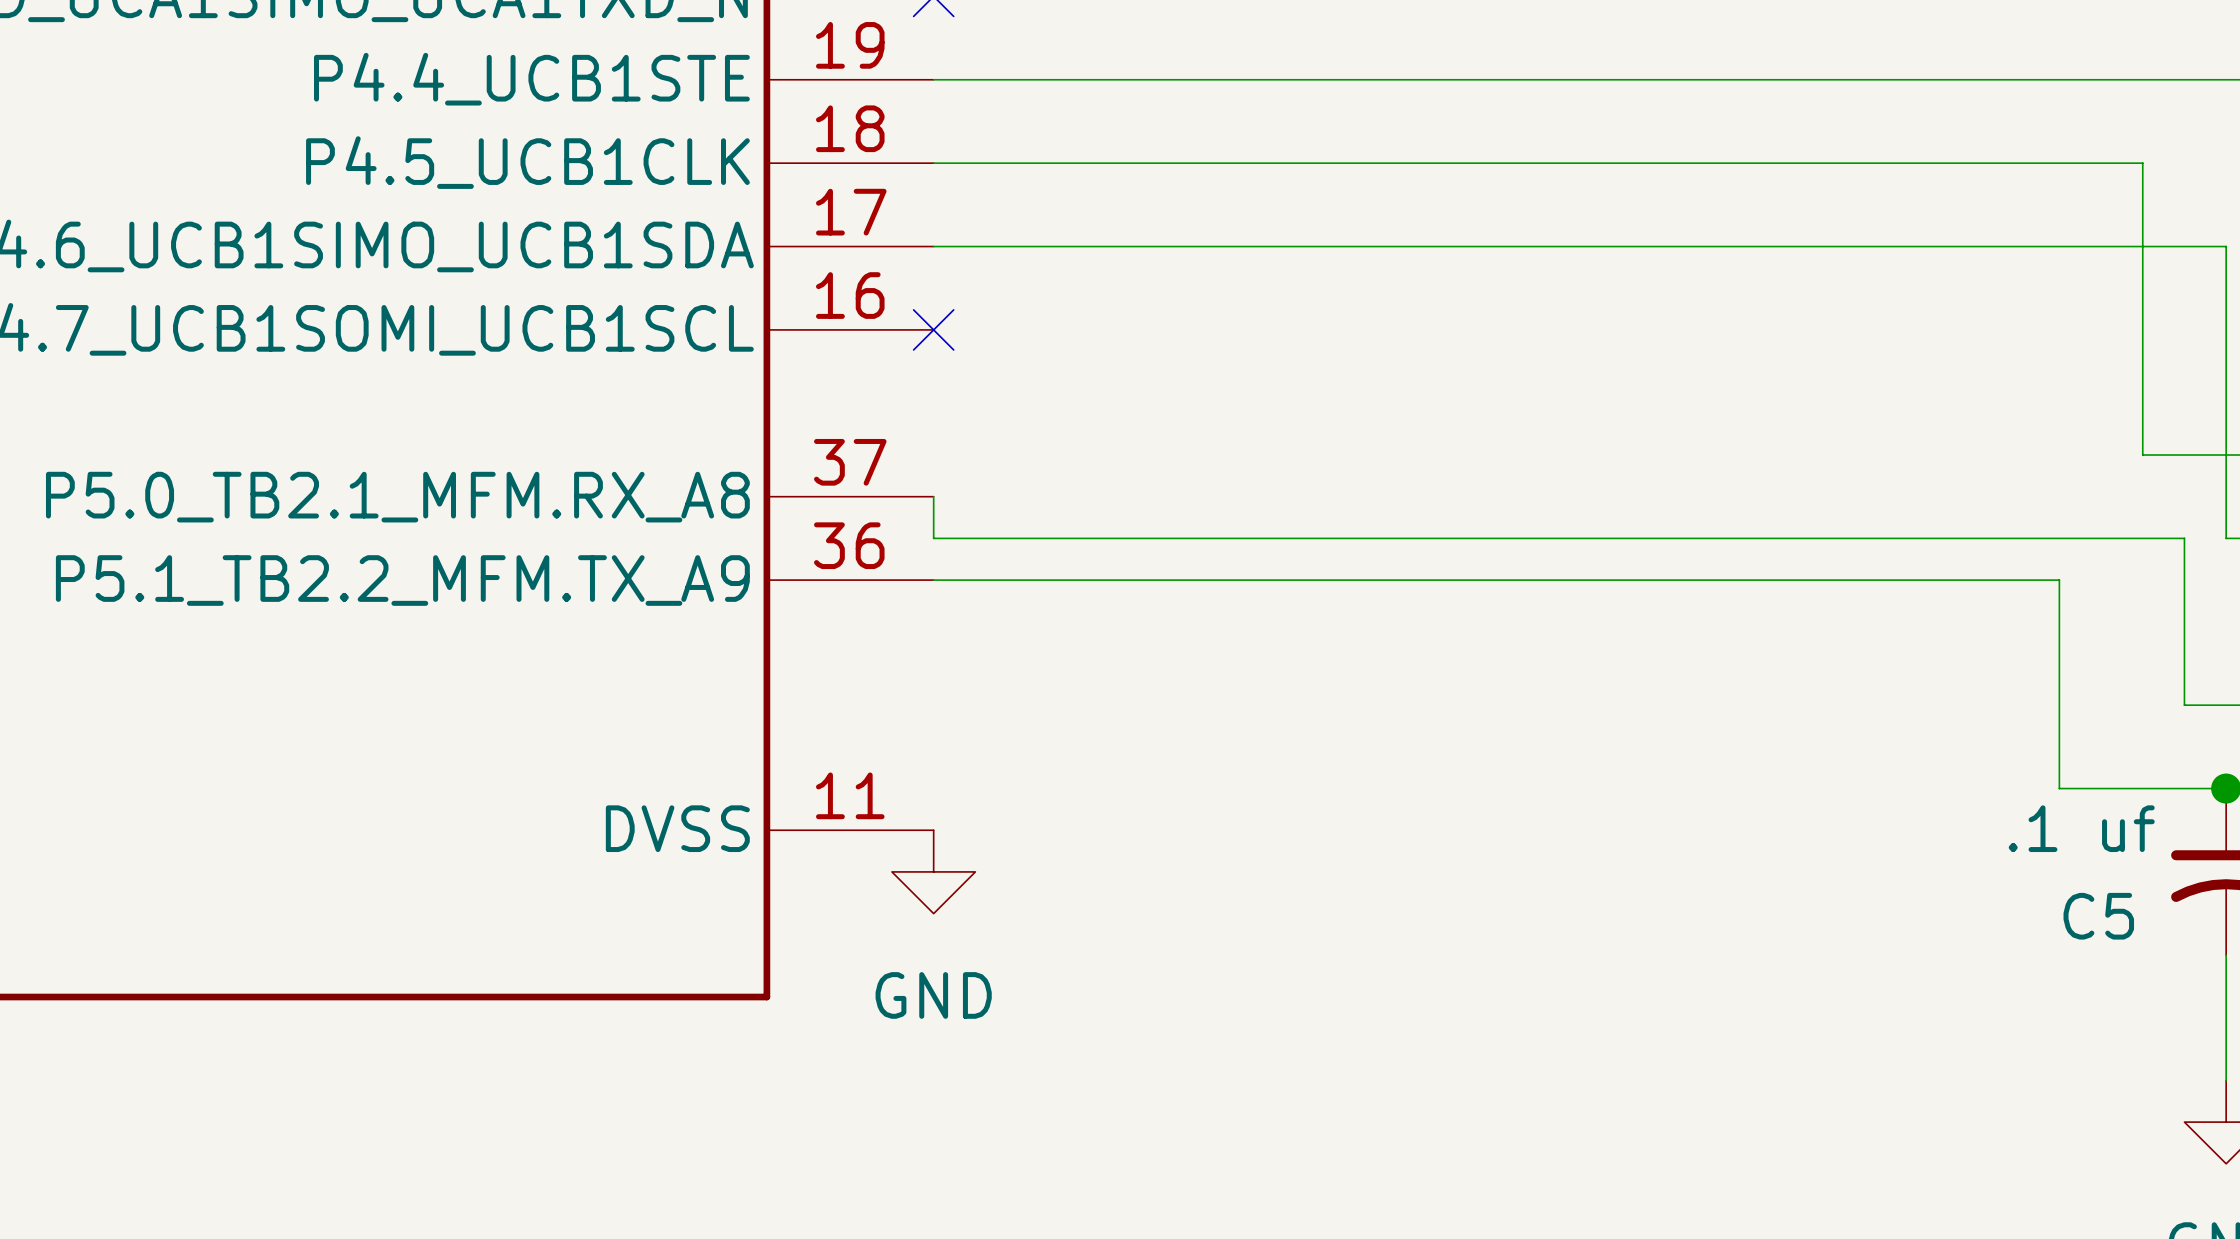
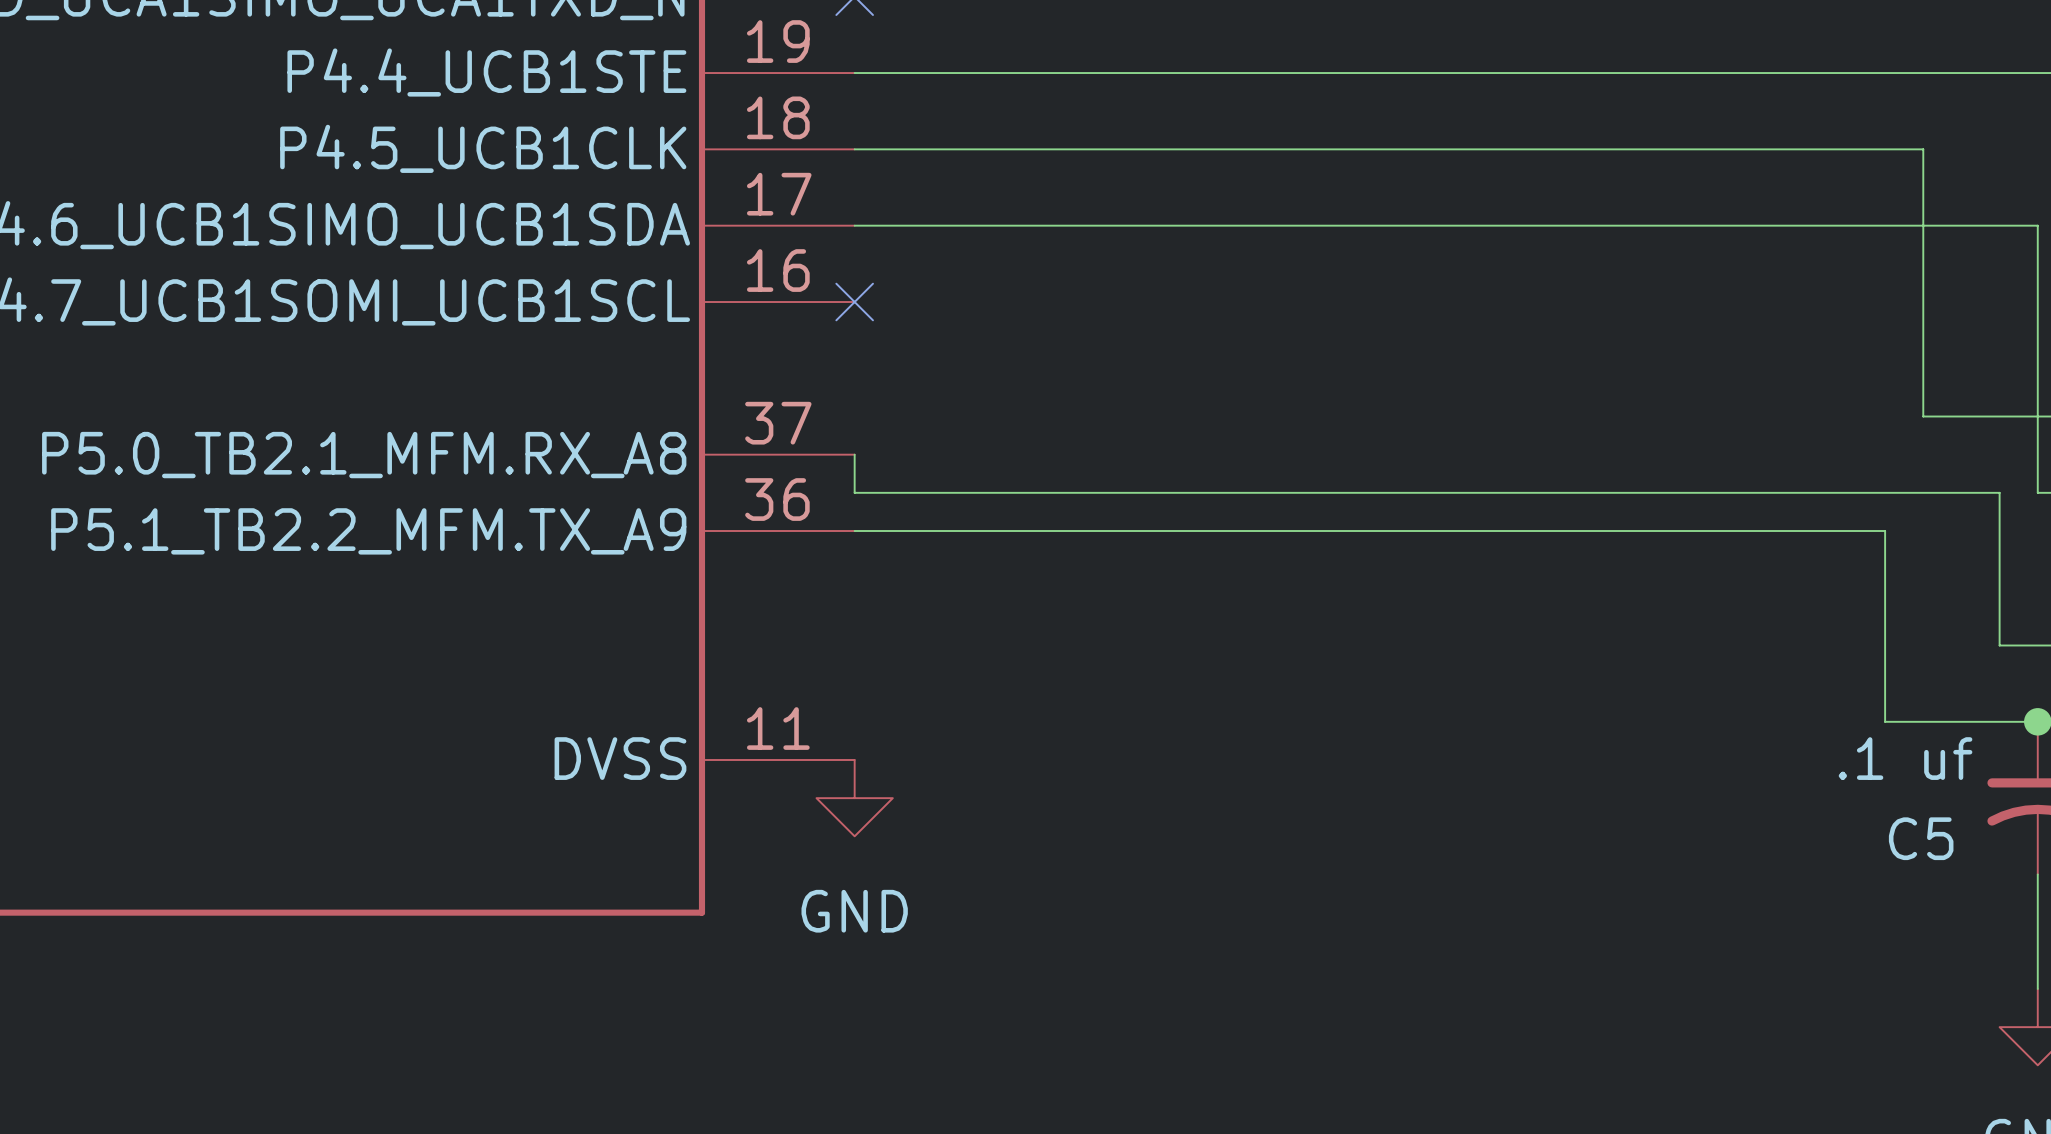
wire: (2101, 163) (2142, 163) (2142, 455) -> (1923, 149) (1923, 416) (1961, 416)

